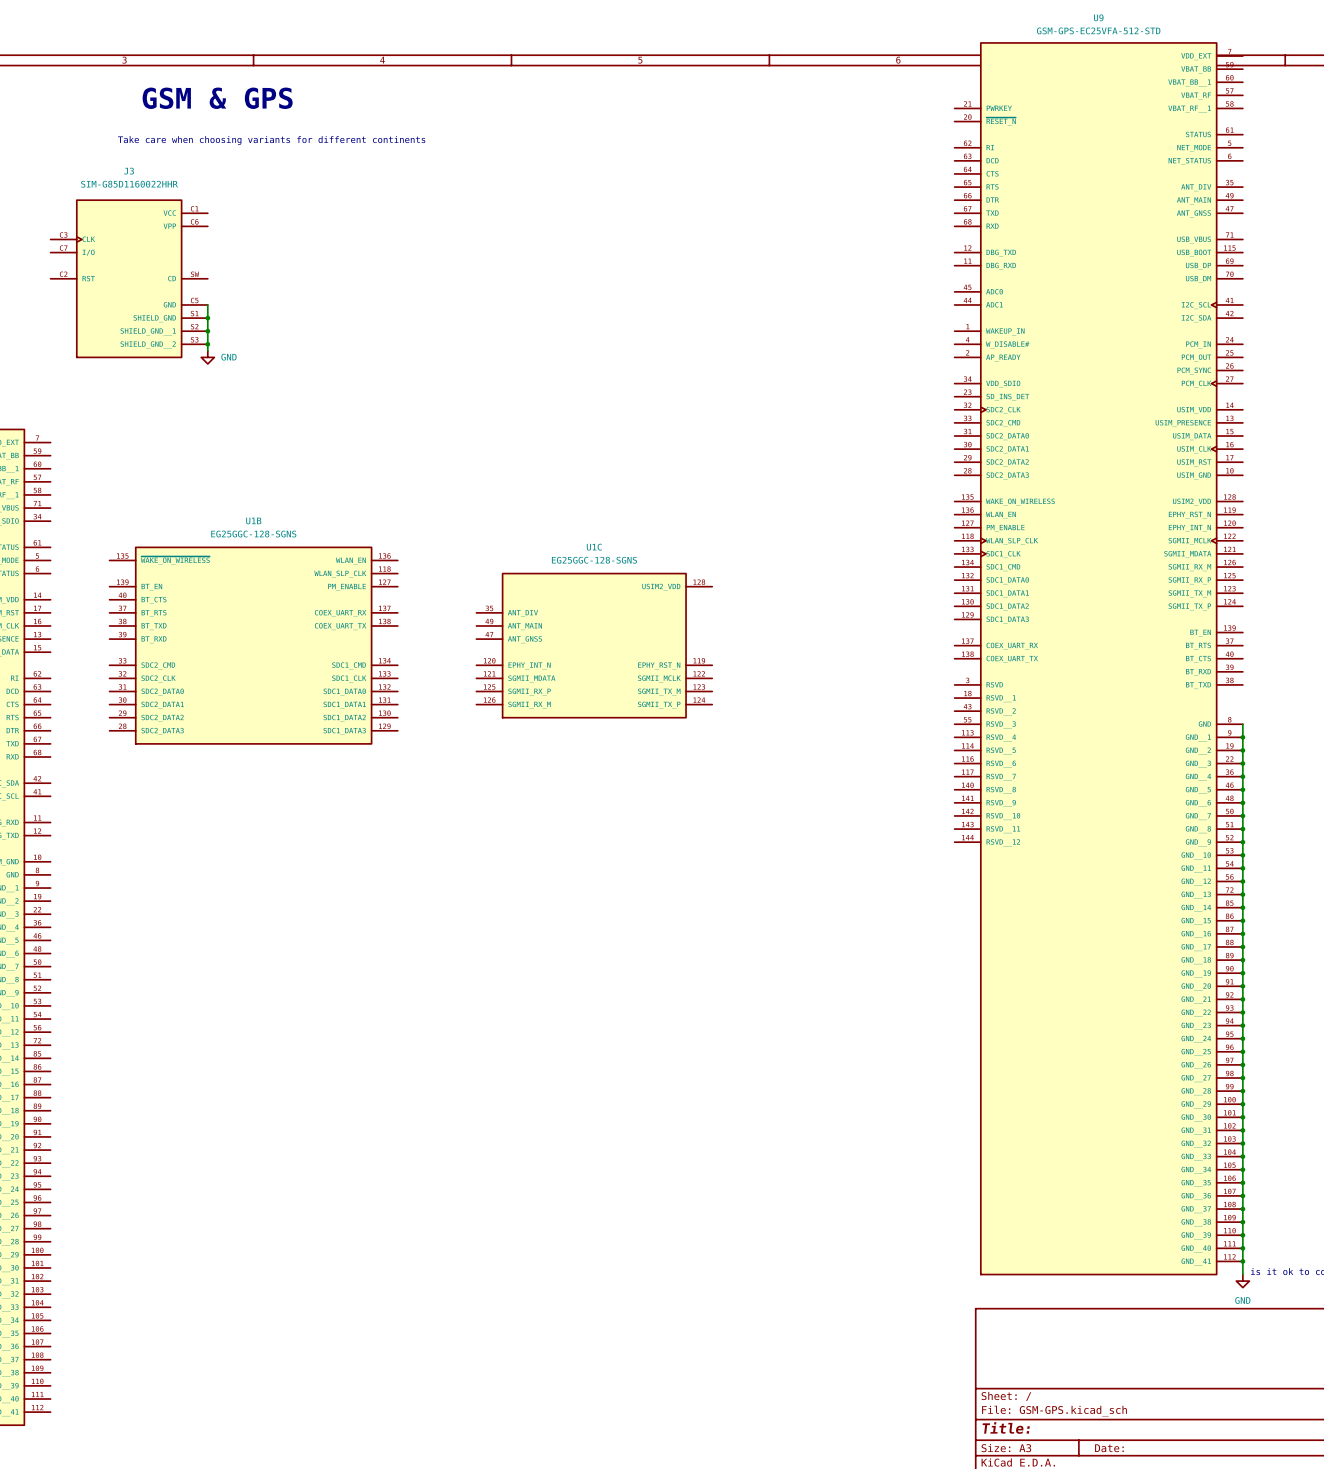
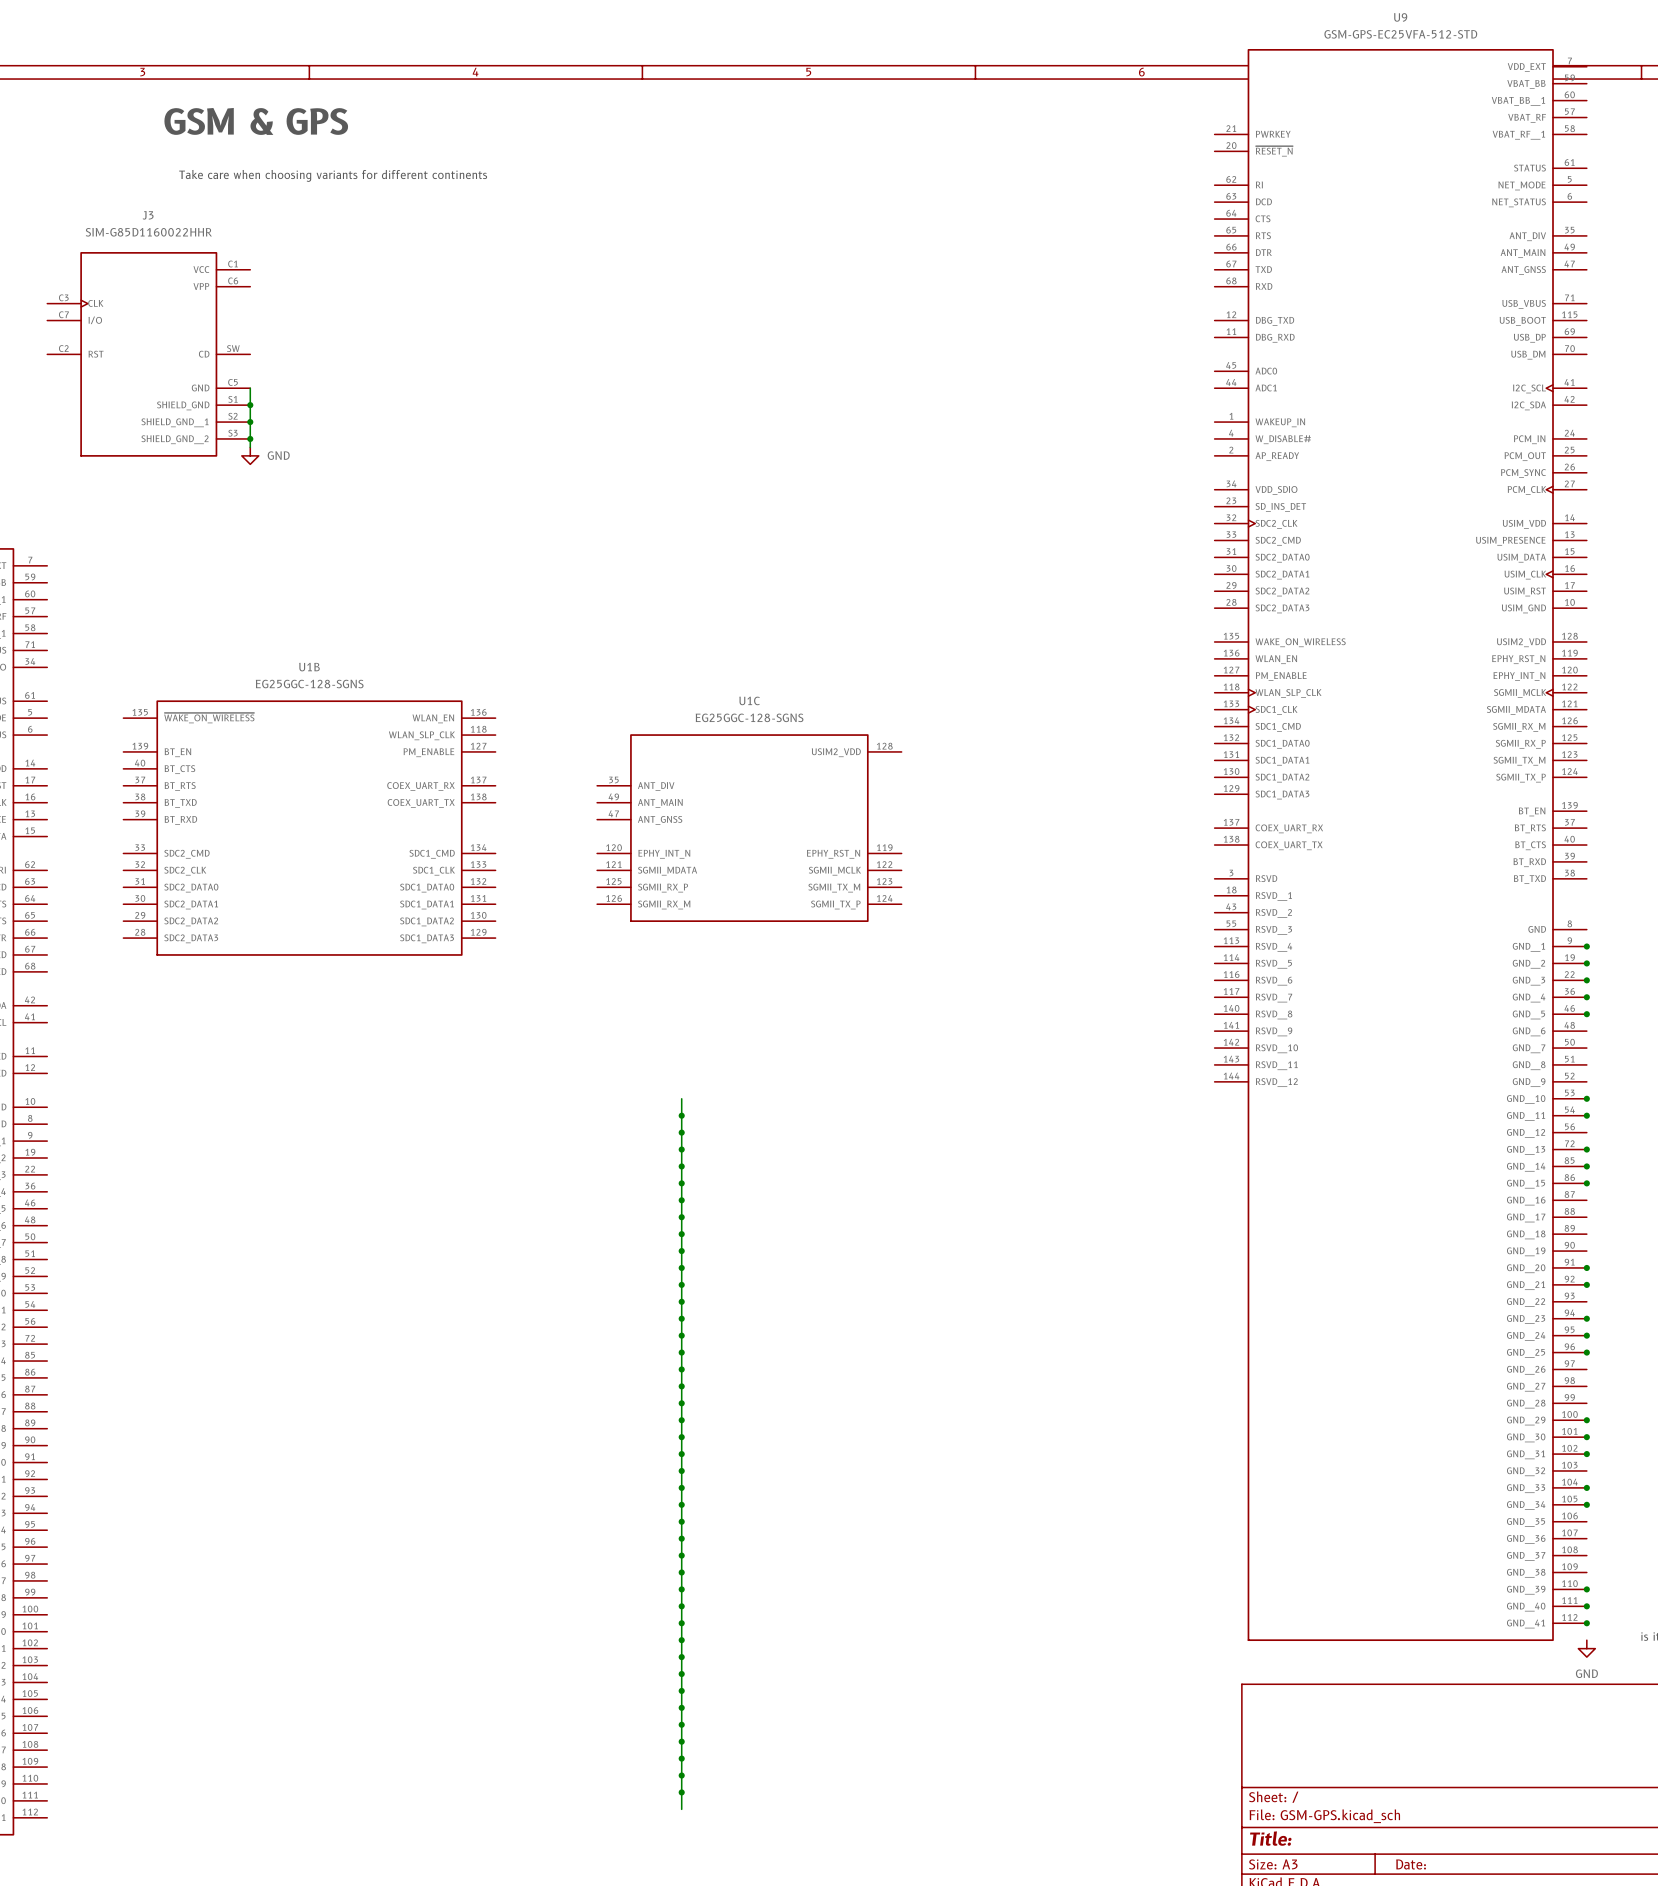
wire: (1242, 724) (1242, 1274) -> none
junction: (1242, 802) -> none
junction: (1242, 815) -> none
junction: (1242, 829) -> none
junction: (1242, 842) -> none
wire: none -> (681, 1098) (681, 1809)
junction: none -> (681, 1115)
junction: none -> (681, 1132)
junction: (1242, 881) -> none
junction: none -> (681, 1149)
junction: none -> (681, 1166)
junction: none -> (681, 1183)
junction: none -> (681, 1200)
junction: (1242, 933) -> none
junction: none -> (681, 1217)
junction: (1242, 946) -> none
junction: none -> (681, 1234)
junction: (1242, 960) -> none
junction: none -> (681, 1251)
junction: (1242, 973) -> none
junction: none -> (681, 1267)
junction: none -> (681, 1284)
junction: none -> (681, 1301)
junction: (1242, 1012) -> none
junction: none -> (681, 1318)
junction: none -> (681, 1335)
junction: none -> (681, 1352)
junction: none -> (681, 1369)
junction: (1242, 1064) -> none
junction: none -> (681, 1386)
junction: (1242, 1078) -> none
junction: none -> (681, 1403)
junction: (1242, 1091) -> none
junction: none -> (681, 1420)
junction: none -> (681, 1437)
junction: none -> (681, 1454)
junction: none -> (681, 1470)
junction: (1242, 1143) -> none
junction: none -> (681, 1487)
junction: none -> (681, 1504)
junction: none -> (681, 1521)
junction: (1242, 1182) -> none
junction: none -> (681, 1538)
junction: (1242, 1195) -> none
junction: none -> (681, 1555)
junction: (1242, 1209) -> none
junction: none -> (681, 1572)
junction: (1242, 1222) -> none
junction: none -> (681, 1589)
junction: none -> (681, 1606)
junction: none -> (681, 1623)
junction: none -> (681, 1640)
junction: none -> (681, 1657)
junction: none -> (681, 1674)
junction: none -> (681, 1690)
junction: none -> (681, 1707)
junction: none -> (681, 1724)
junction: none -> (681, 1741)
junction: none -> (681, 1758)
junction: none -> (681, 1775)
junction: none -> (681, 1792)

